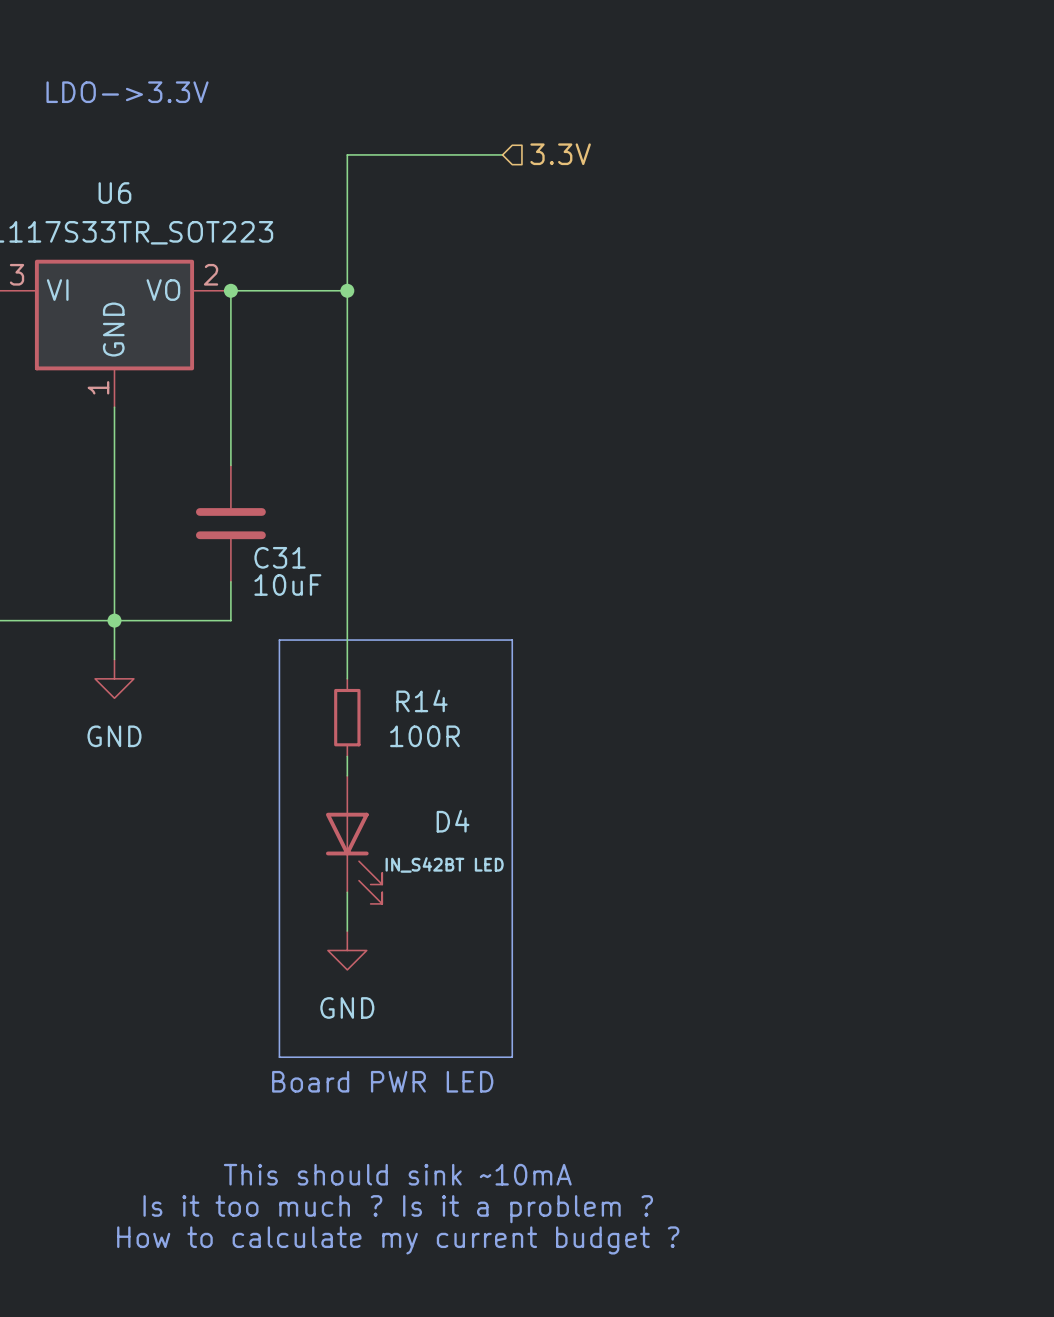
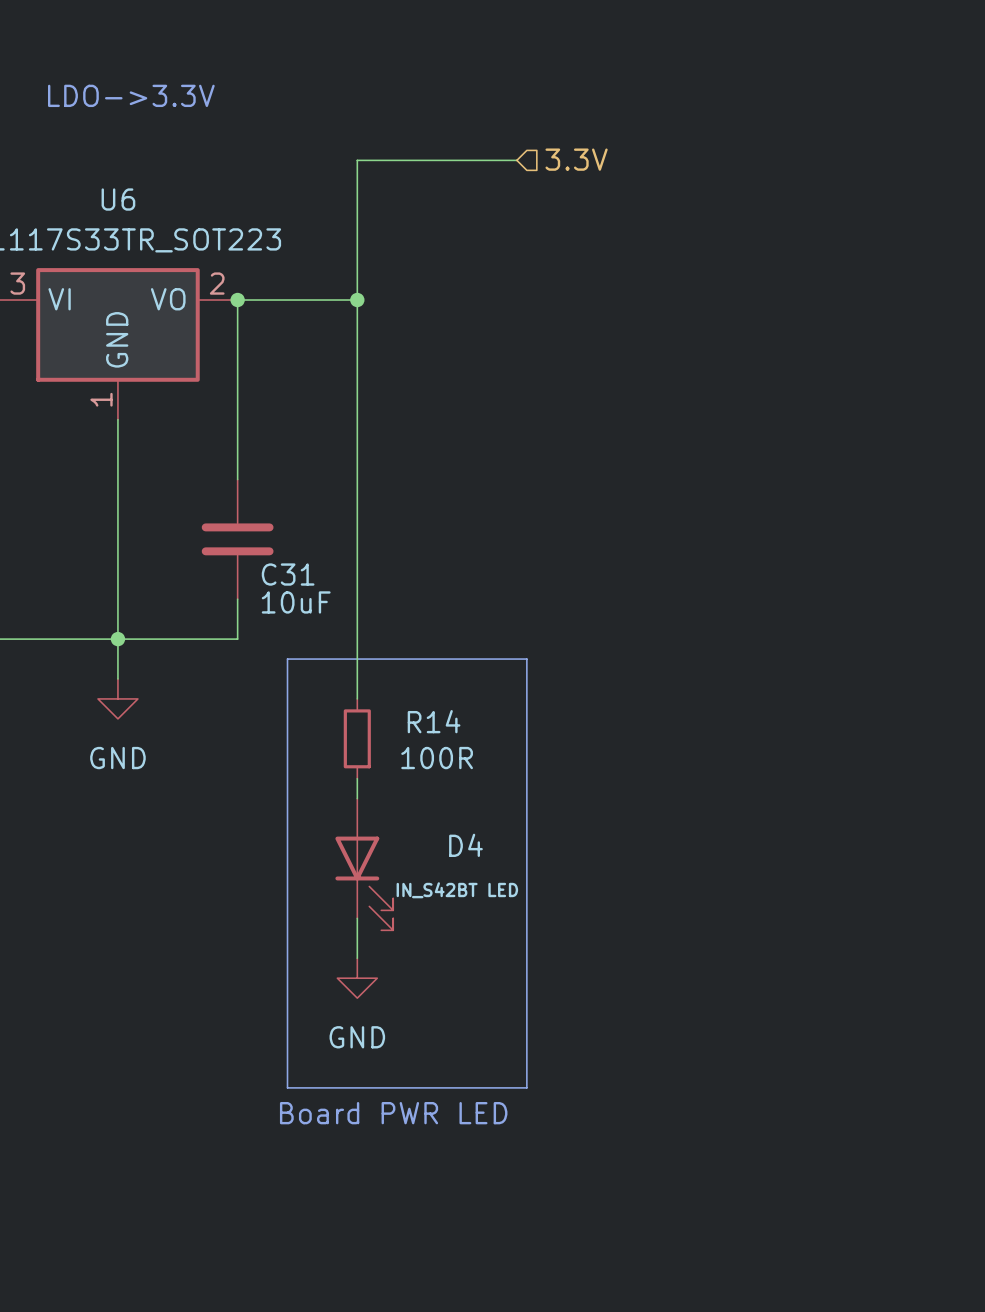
text: This should sink ~10mA (397, 1174) -> none
text: Is it too much ? Is it a problem ? (398, 1209) -> none
text: How to calculate my current budget ? (398, 1240) -> none

